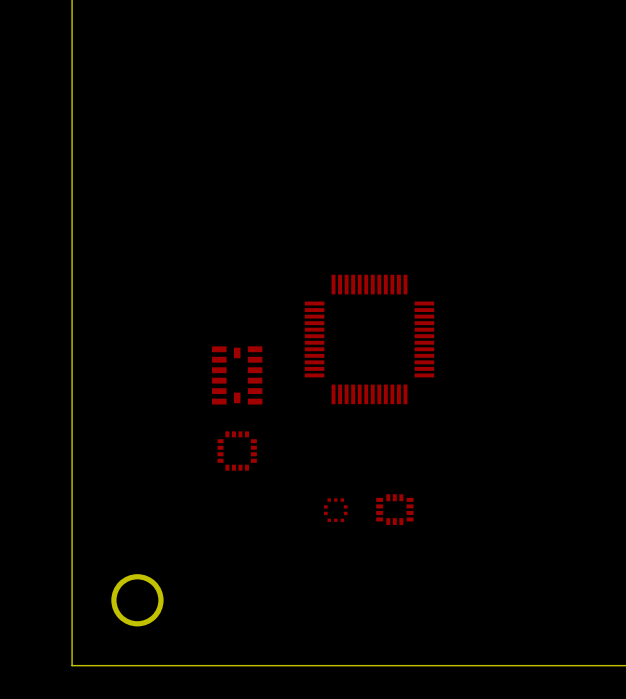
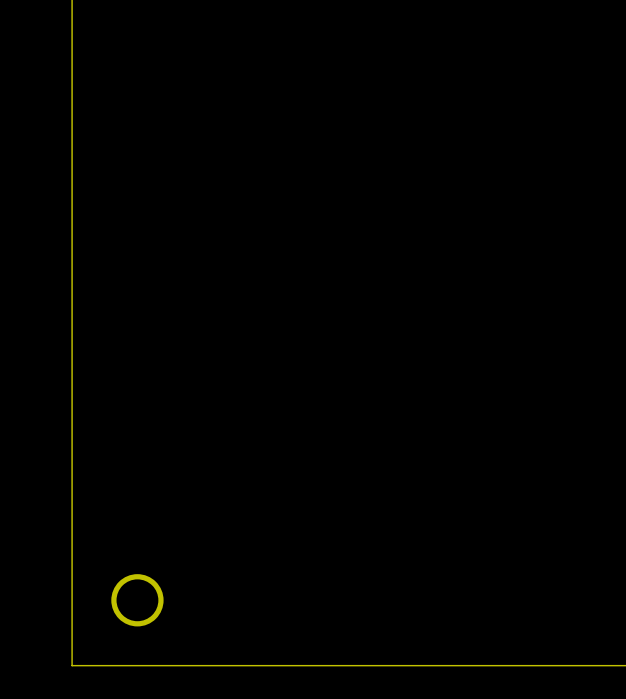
part: (369, 339) -> none
part: (237, 375) -> none
part: (237, 451) -> none
part: (394, 509) -> none
part: (335, 510) -> none

